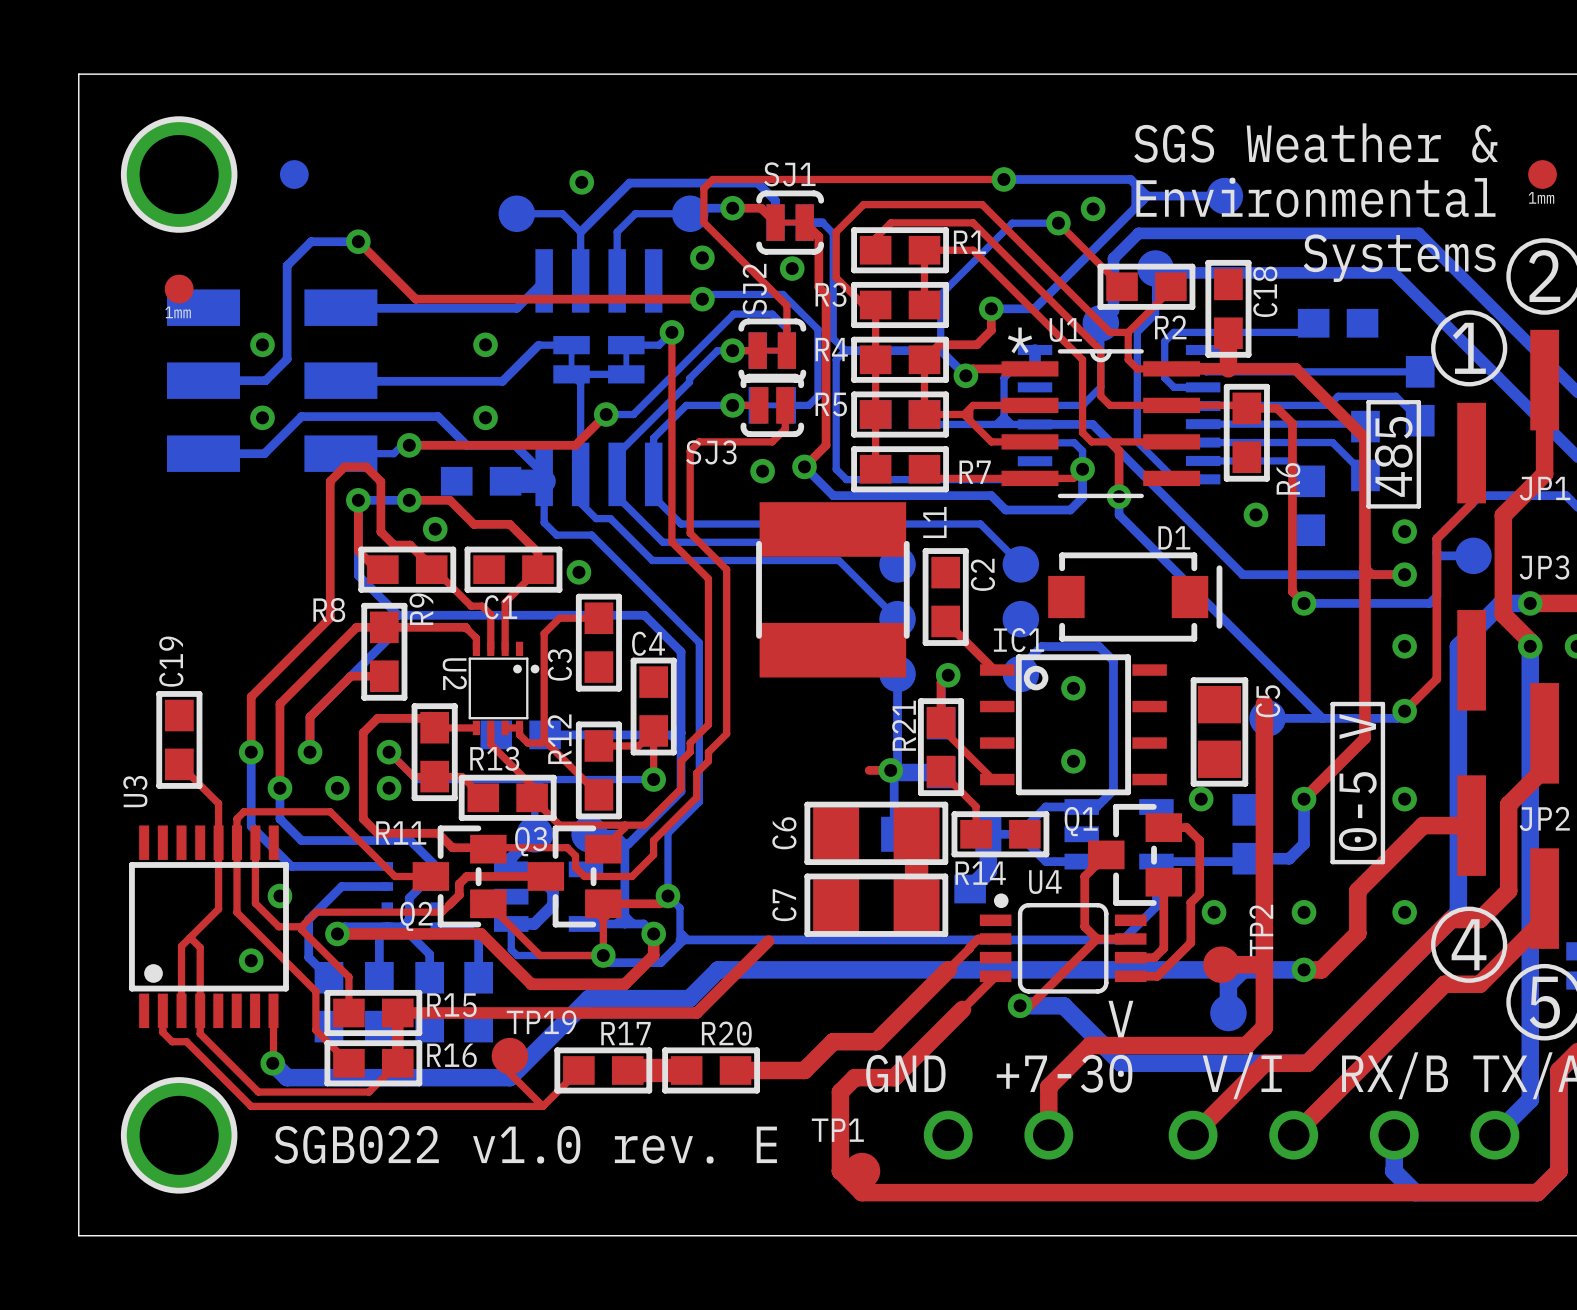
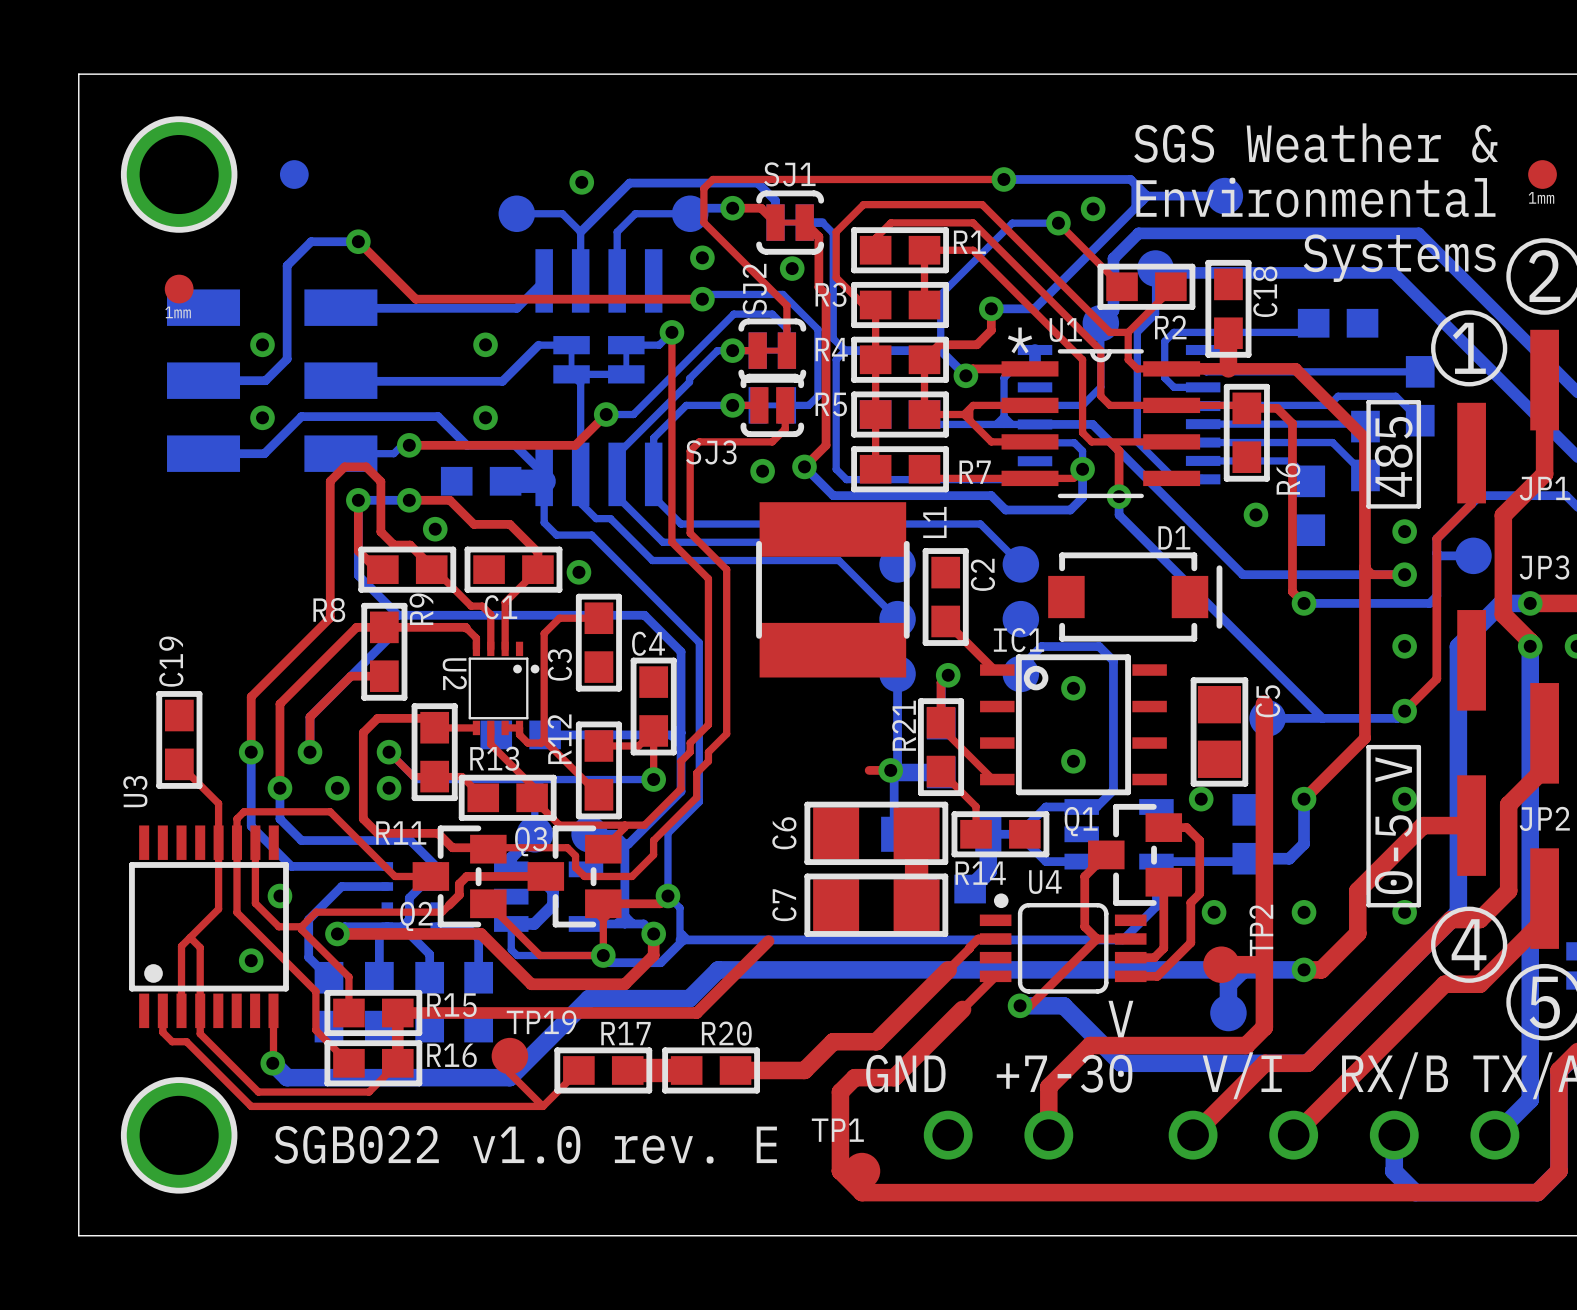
line: (1332, 704) (1382, 704) (1382, 862) (1332, 862) (1332, 704) -> (1368, 747) (1418, 747) (1418, 905) (1368, 905) (1368, 747)
text position: 0-5 V (1357, 782) -> 0-5 V (1393, 825)

